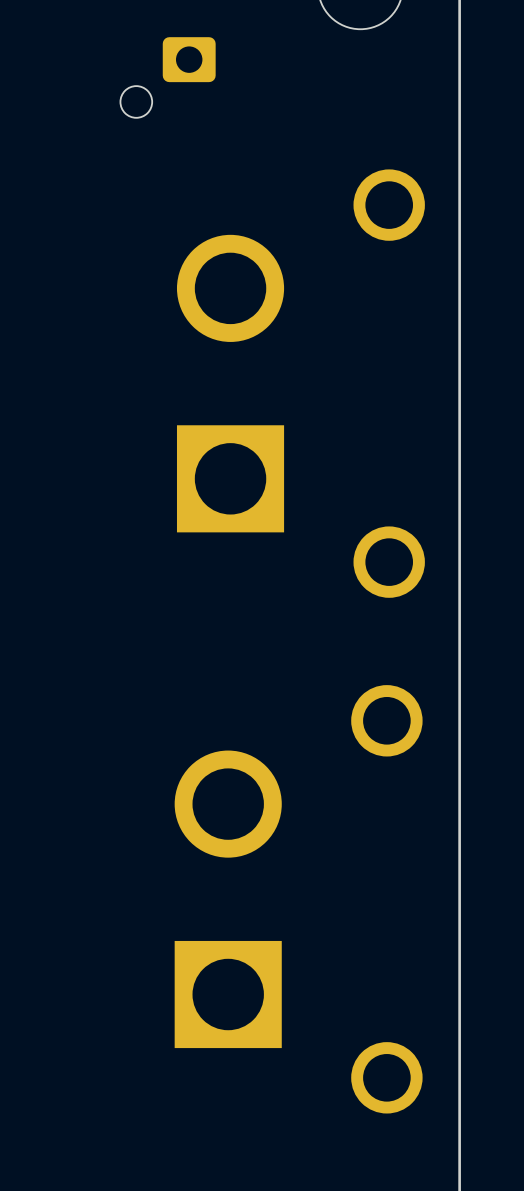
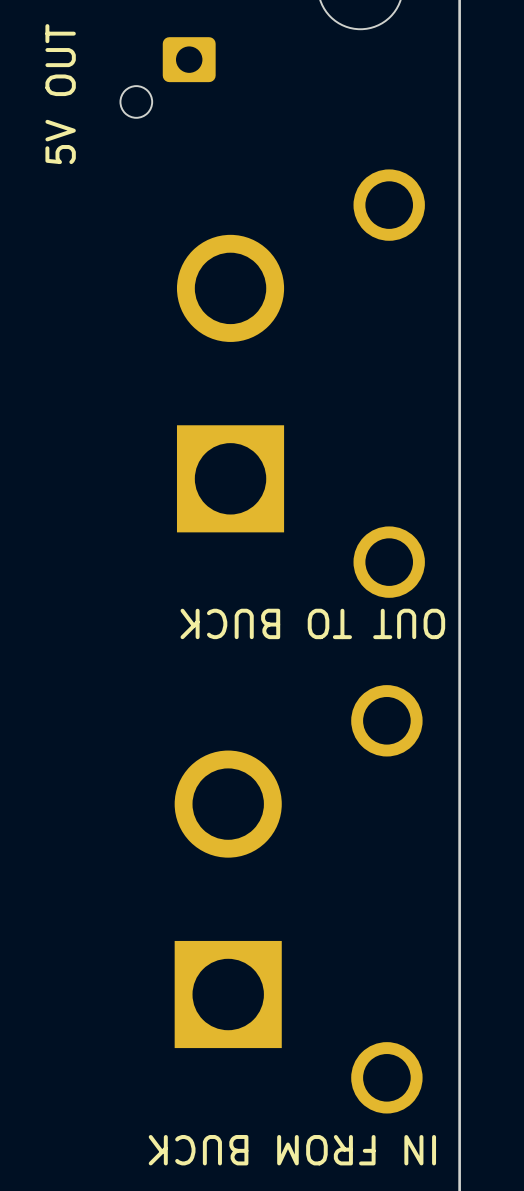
text: none -> 5V OUT (60, 94)
text: none -> OUT TO BUCK (312, 623)
text: none -> IN FROM BUCK (292, 1150)

